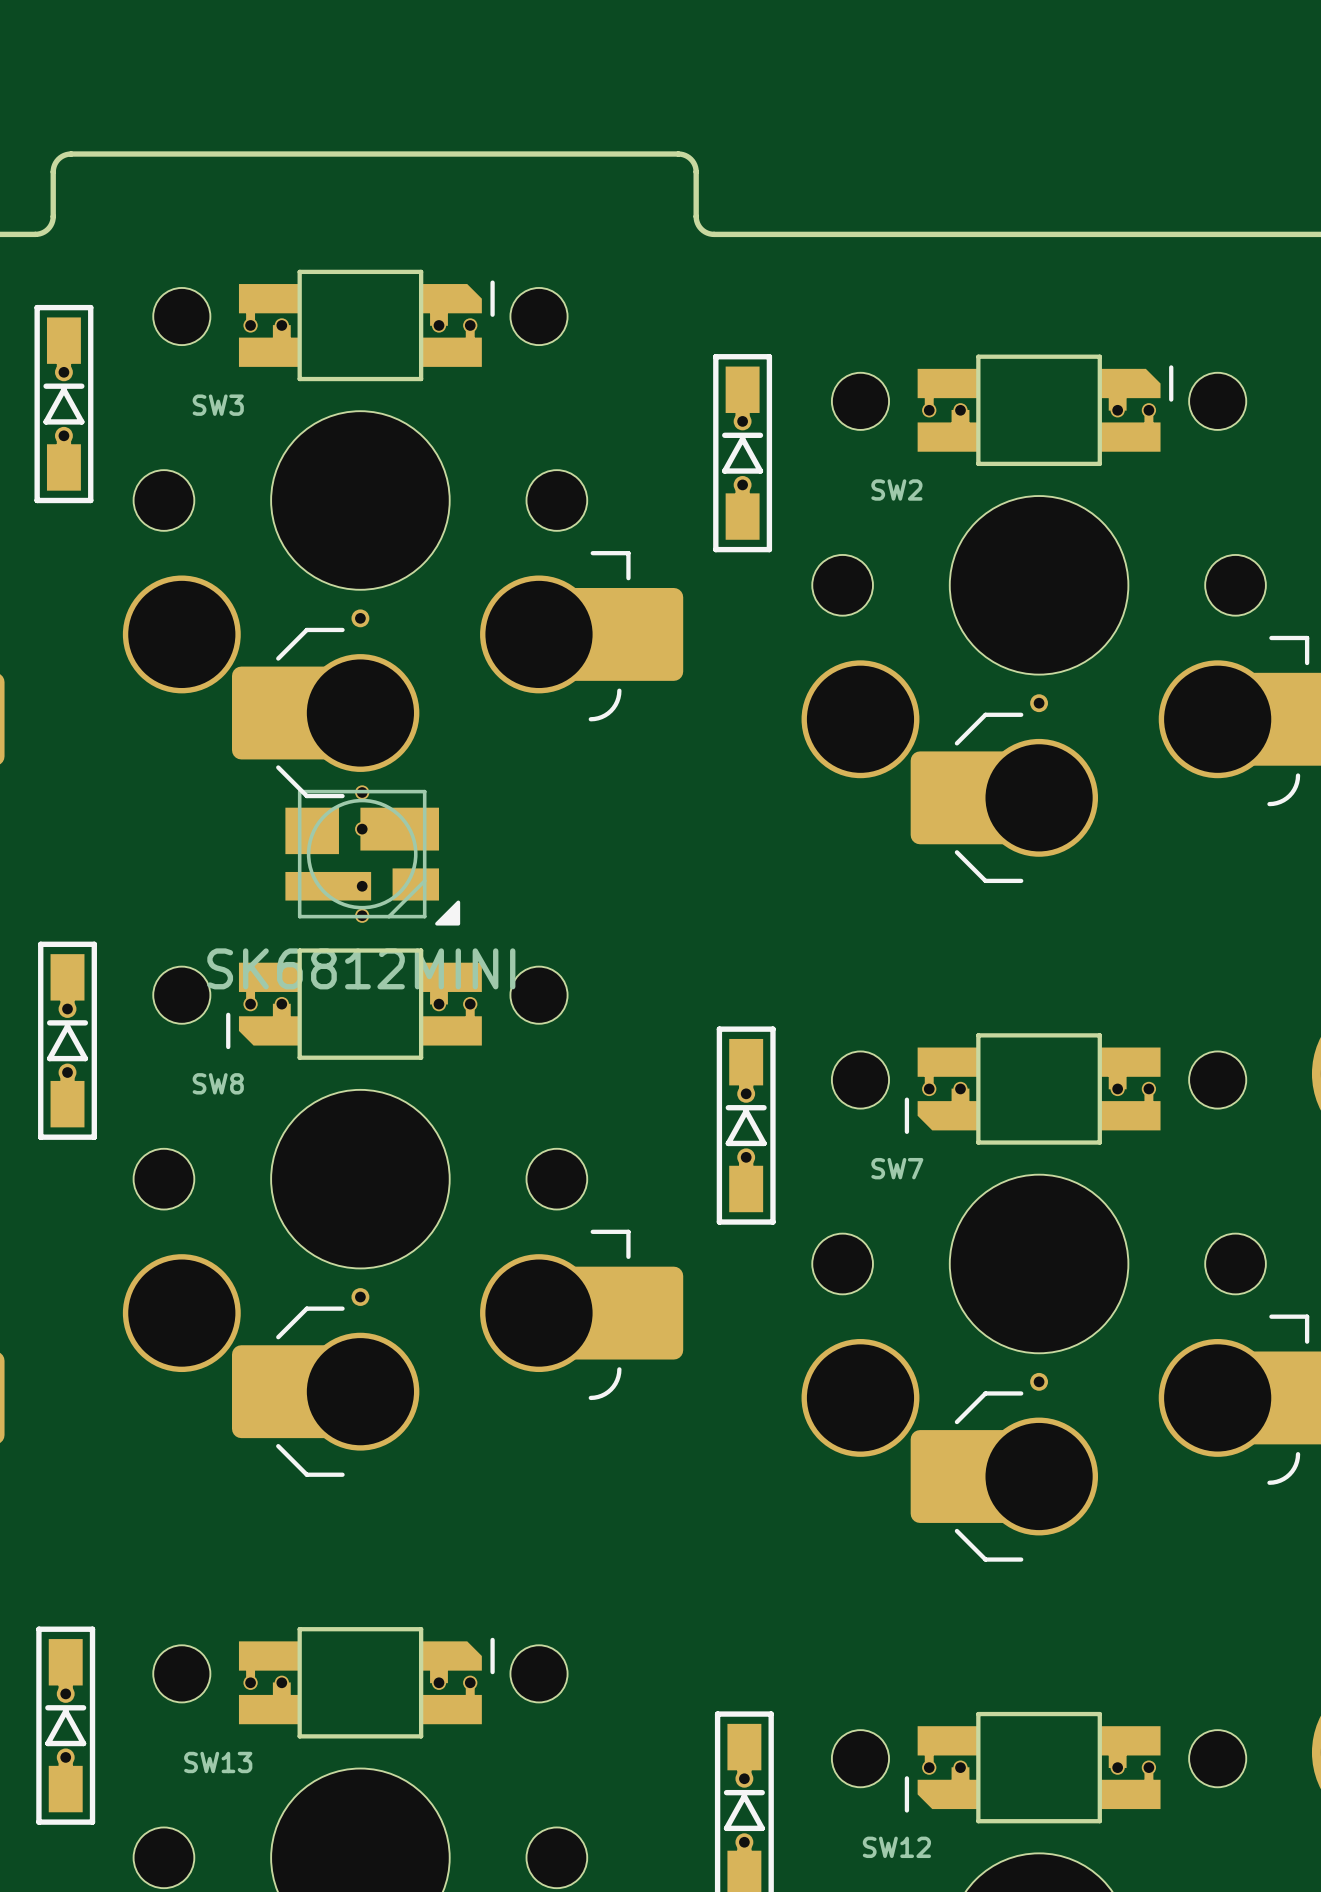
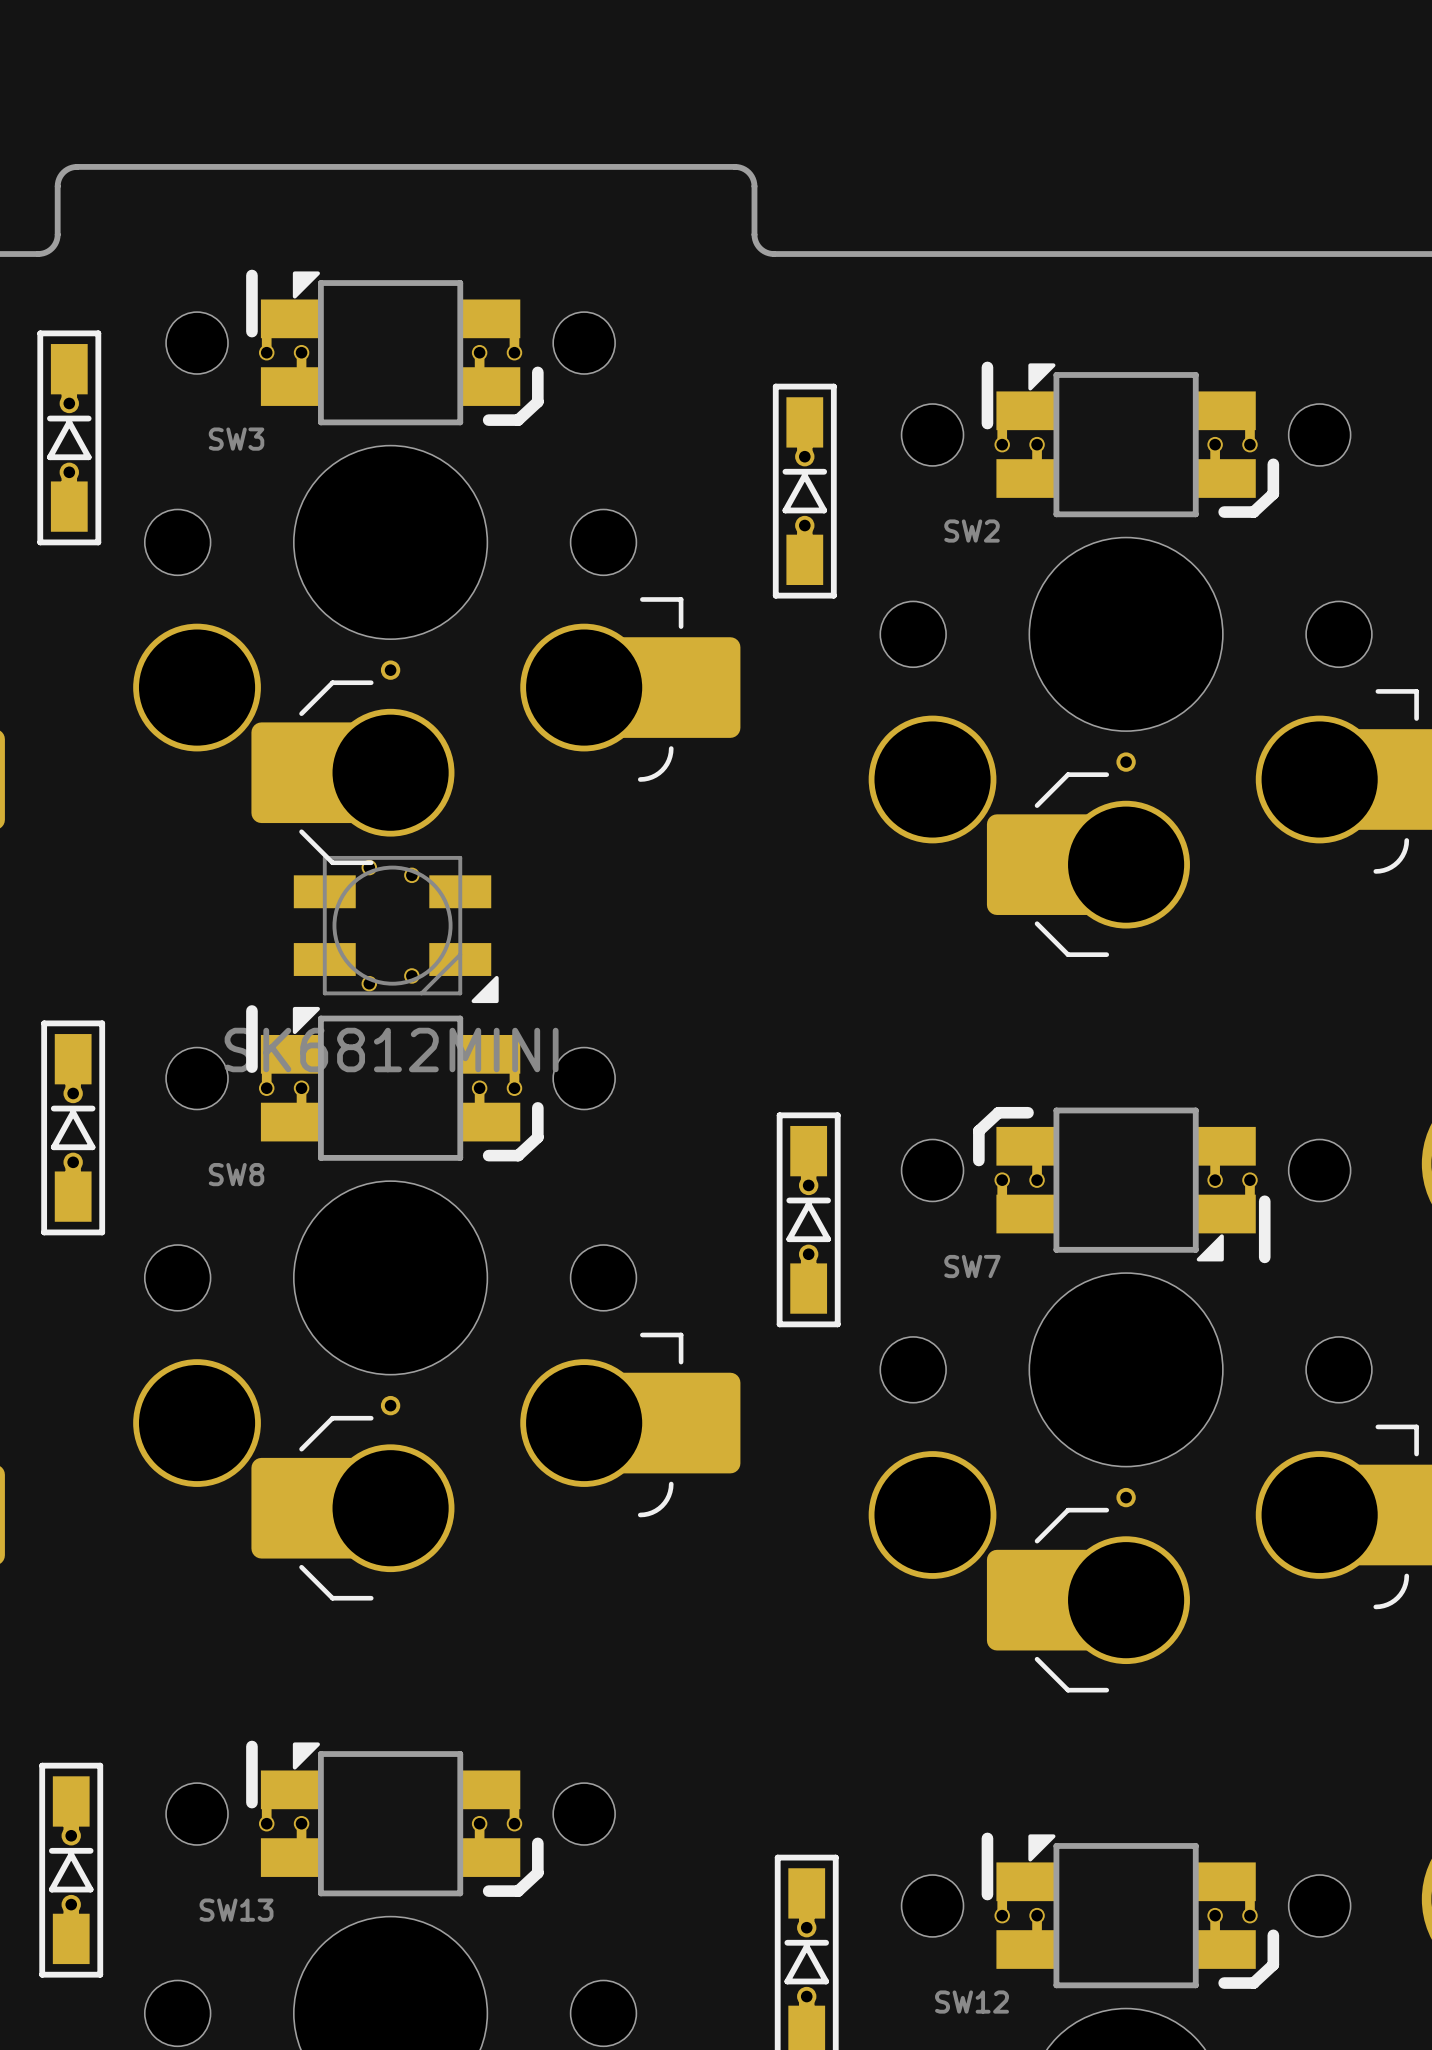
part footprint: [238, 269, 495, 382] -> [246, 269, 544, 426]
part footprint: [917, 354, 1174, 467] -> [981, 361, 1280, 518]
part footprint: [285, 785, 461, 926] -> [293, 855, 499, 1004]
part footprint: [226, 948, 482, 1060] -> [246, 1005, 544, 1162]
part footprint: [904, 1033, 1161, 1145] -> [973, 1106, 1271, 1264]
part footprint: [238, 1627, 495, 1739] -> [246, 1740, 544, 1897]
part footprint: [904, 1711, 1161, 1824] -> [981, 1832, 1280, 1989]

